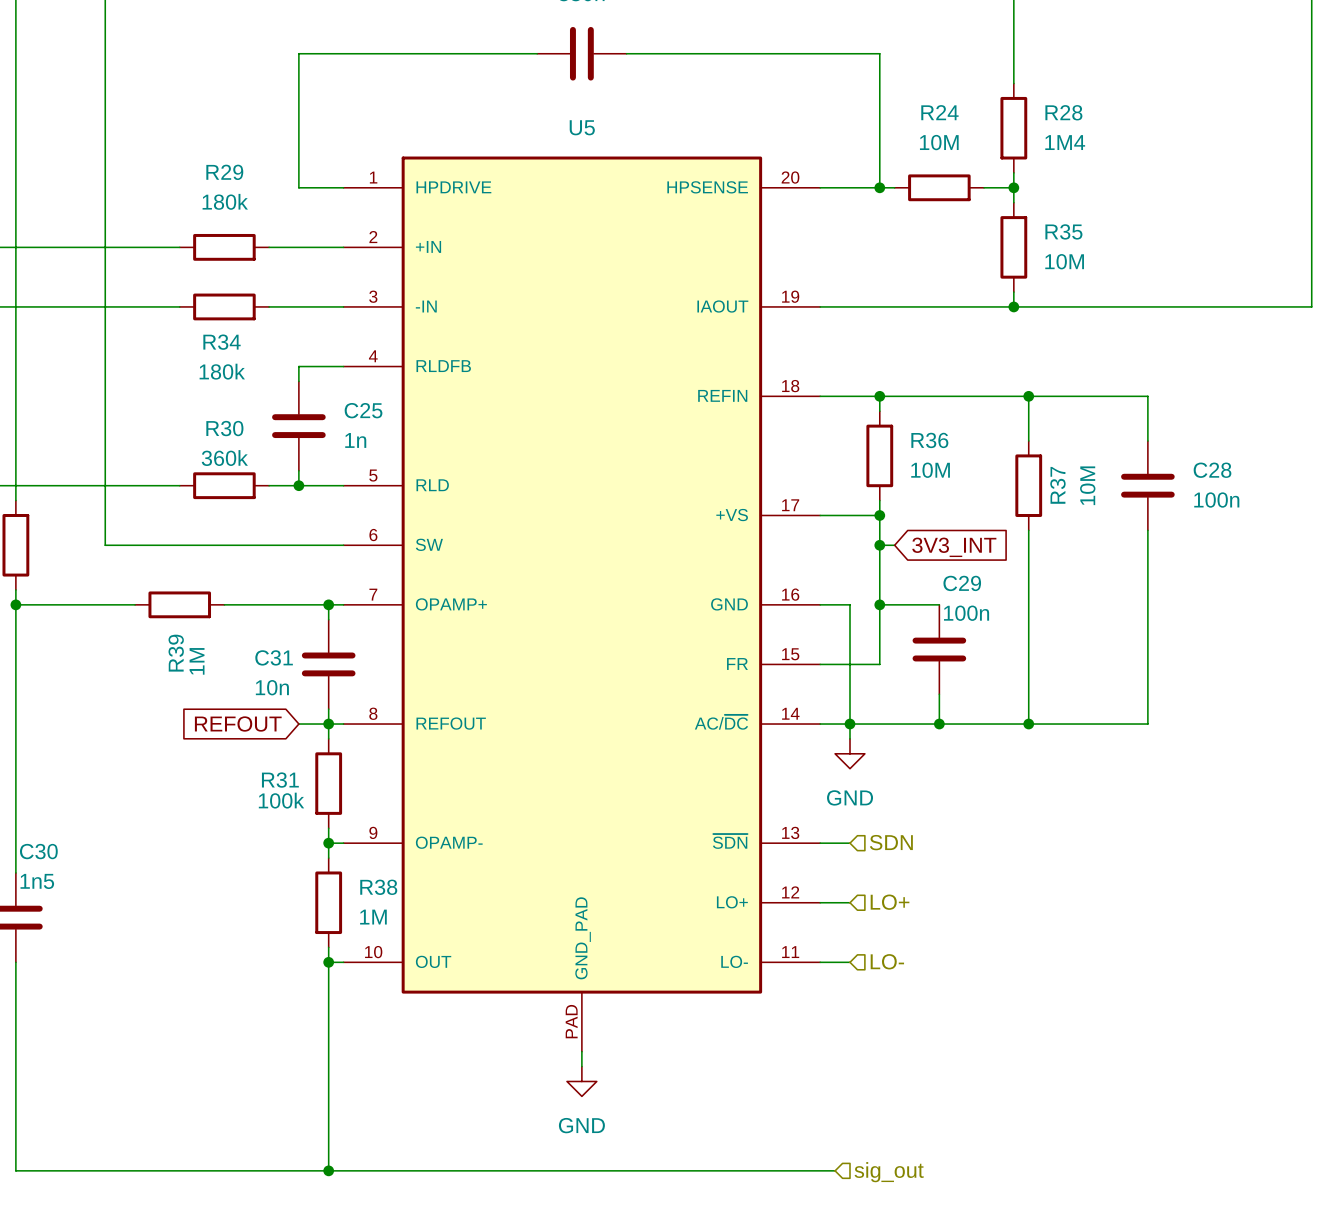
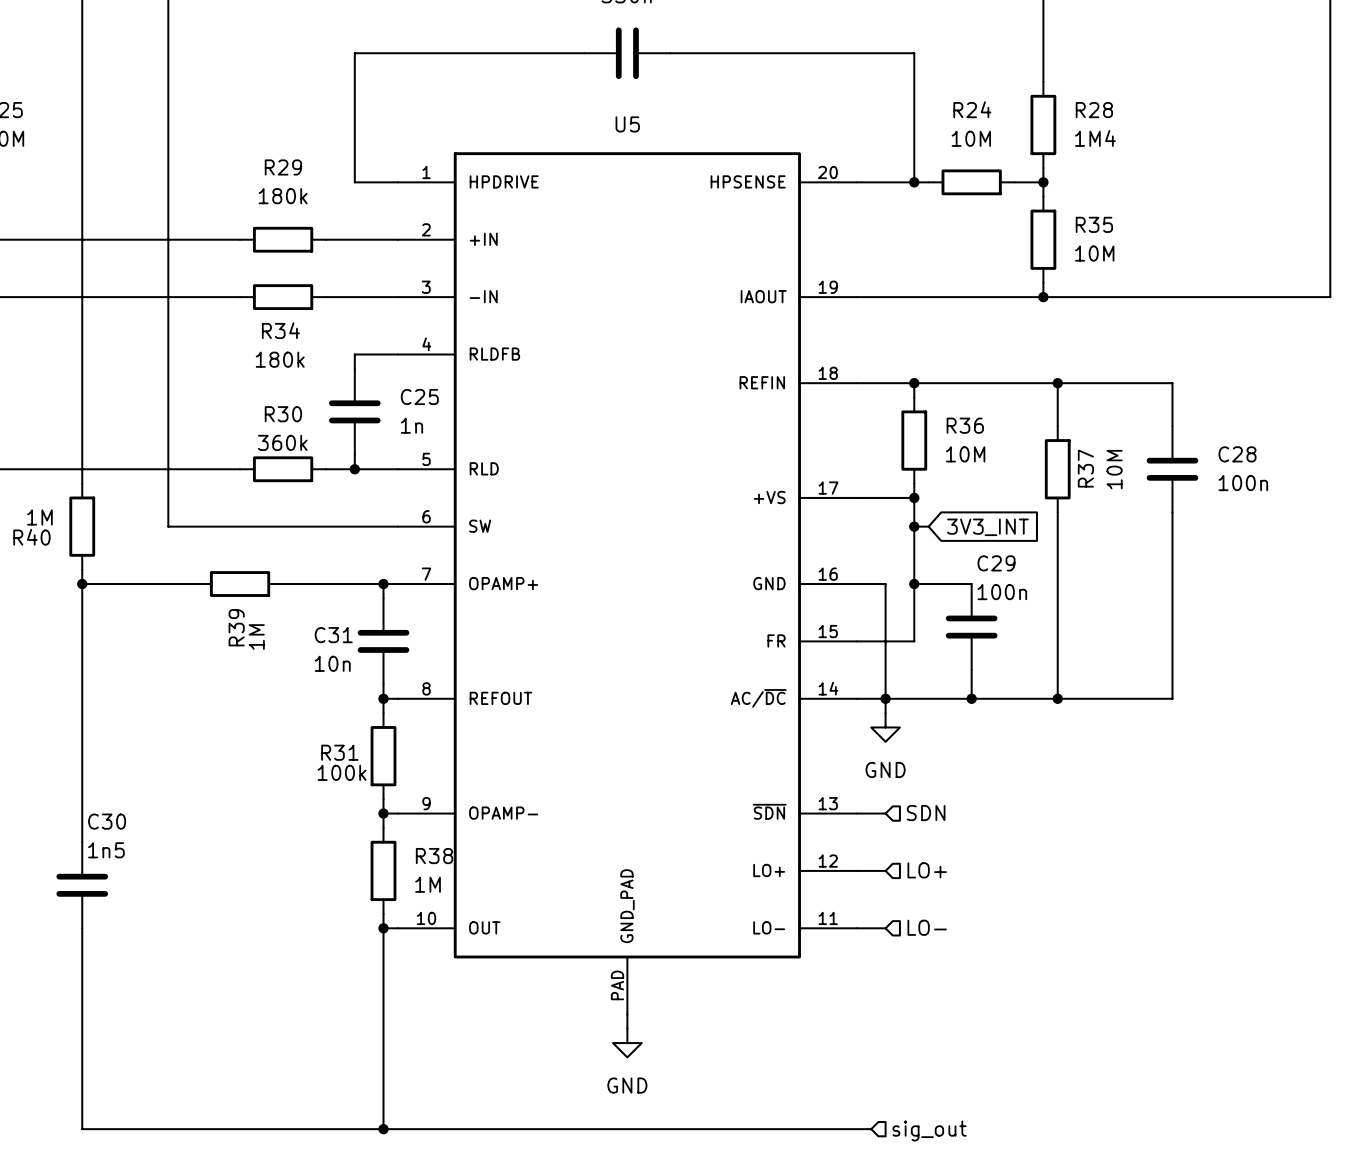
global label: REFOUT (238, 724) -> none
wire: (298, 724) (328, 724) -> none

